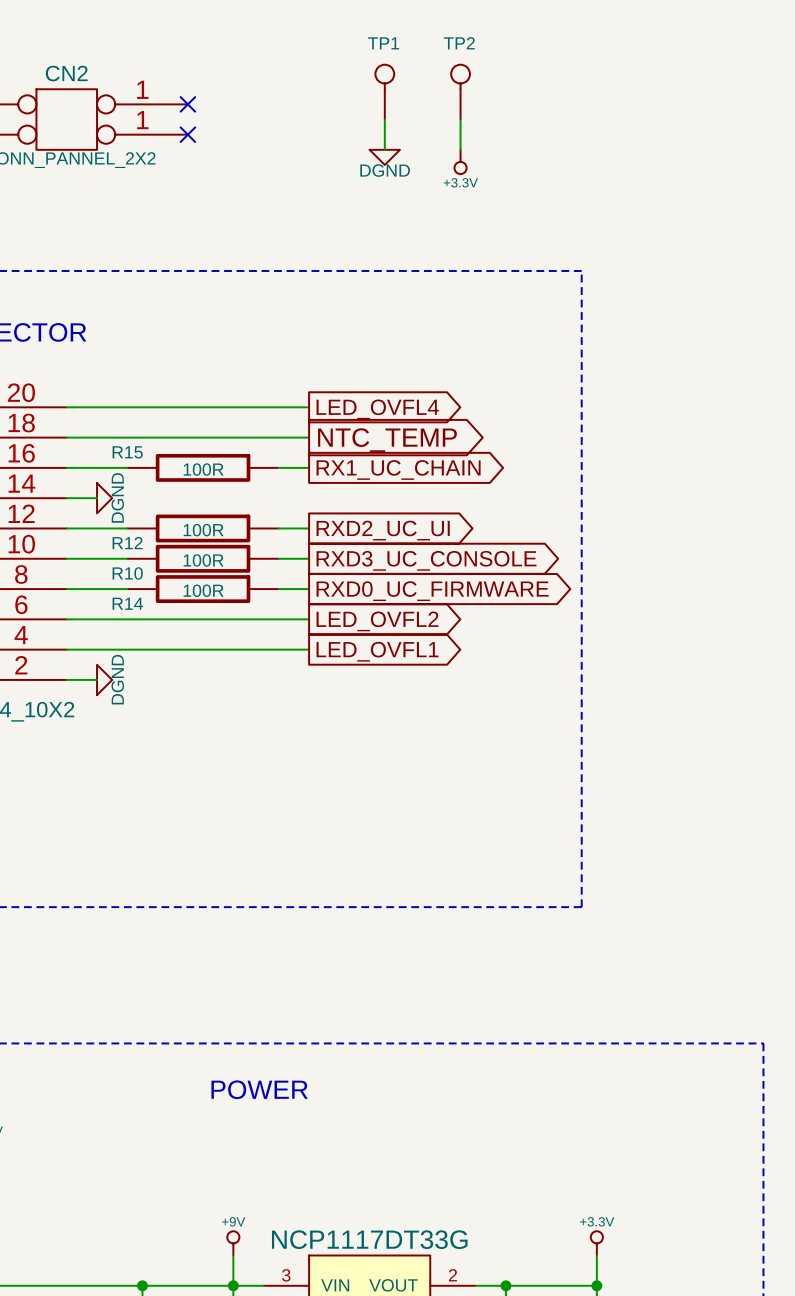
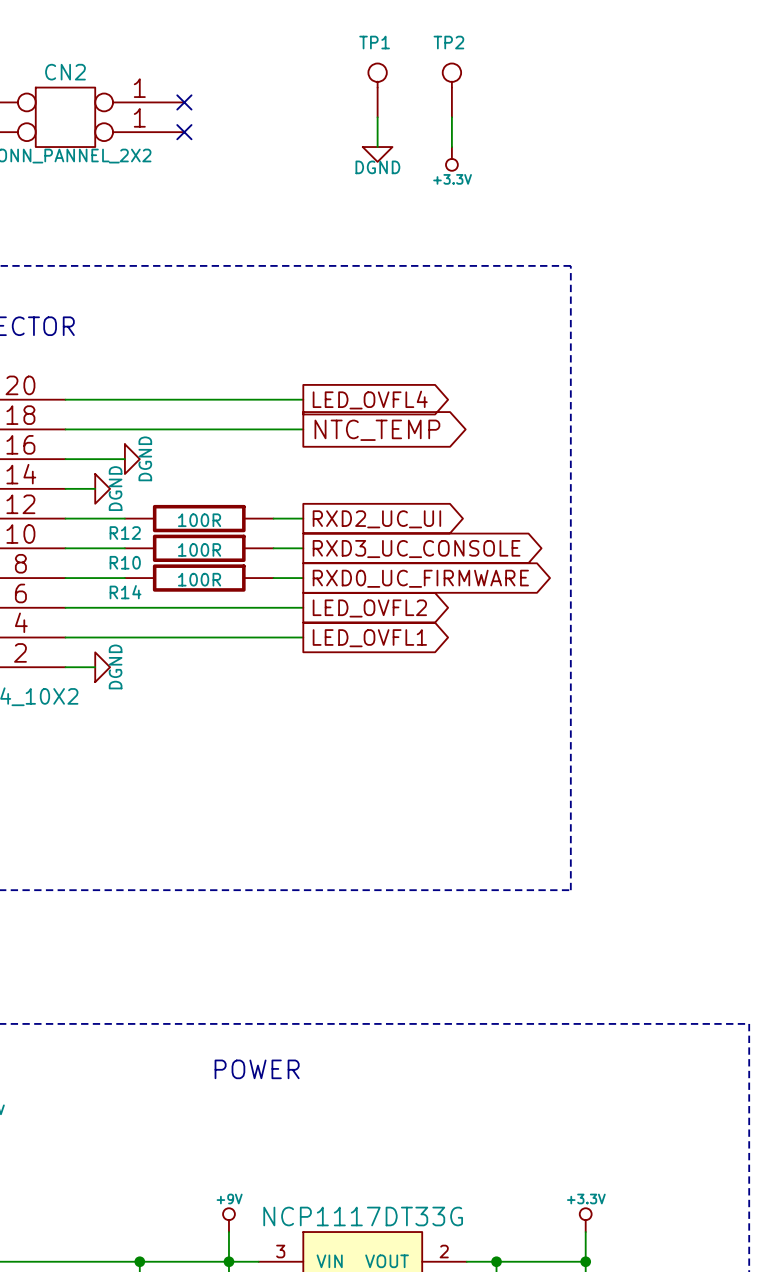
power symbol: none -> DGND (132, 459)
R15: 100R (203, 467) -> none
wire: (278, 467) (309, 467) -> none
global label: RX1_UC_CHAIN (398, 469) -> none

